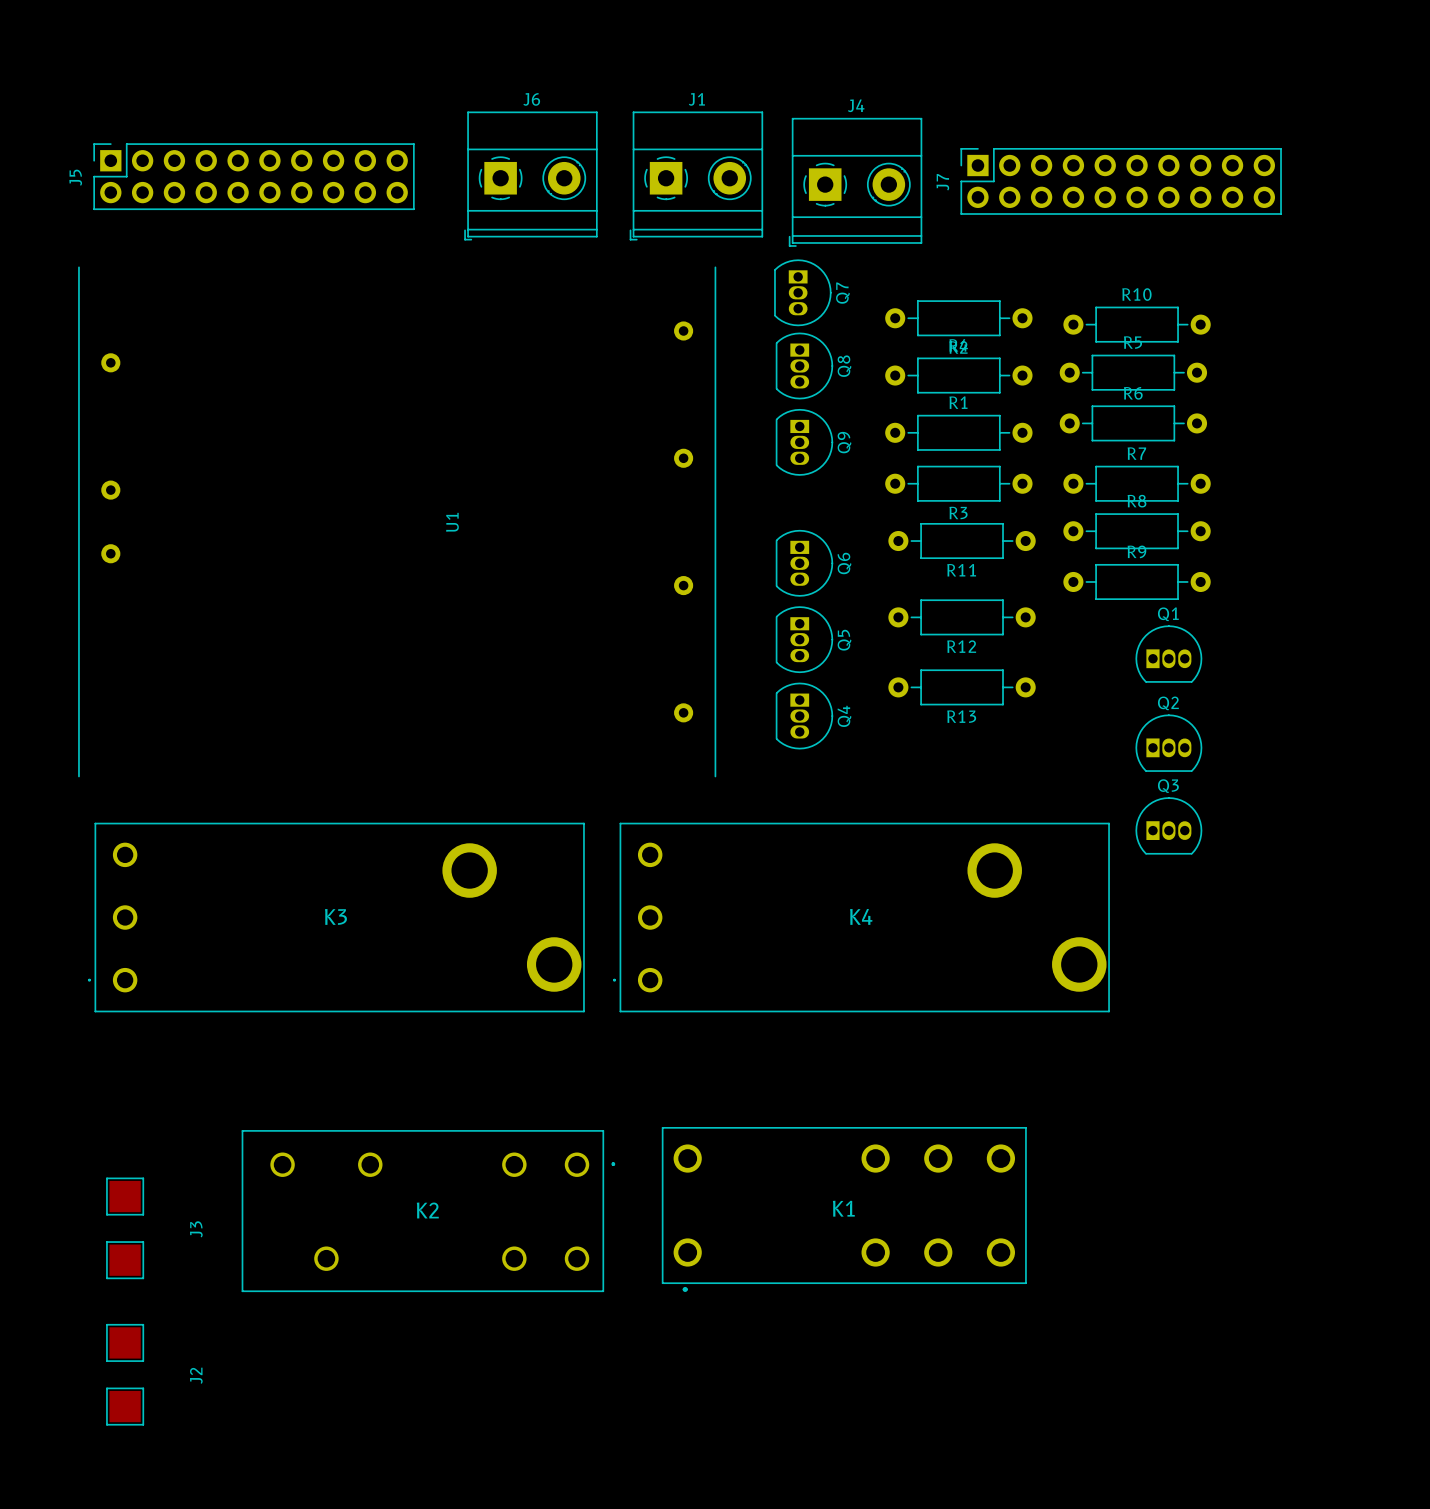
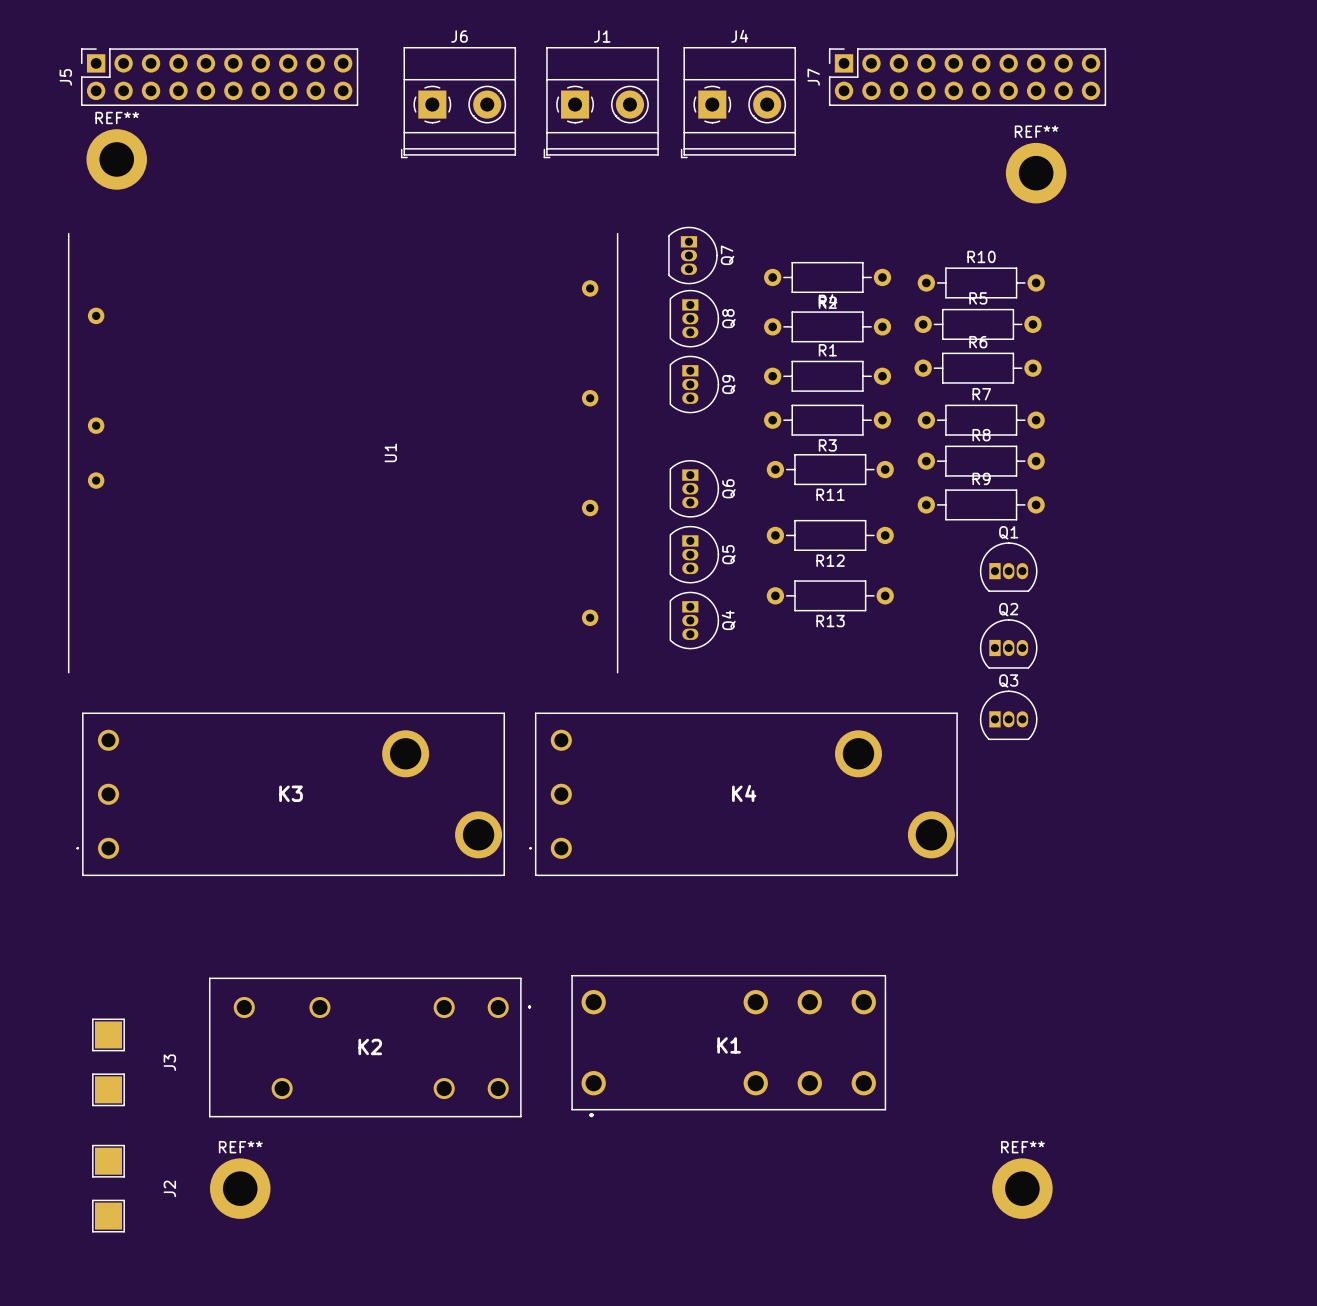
J6 position: (530, 175) -> (458, 102)
J1 position: (696, 175) -> (601, 102)
J5 position: (254, 176) -> (219, 77)
REF**: none -> (116, 159)
J7 position: (1121, 181) -> (967, 77)
J4 position: (855, 182) -> (738, 102)
REF**: none -> (1036, 173)
REF**: none -> (240, 1188)
REF**: none -> (1022, 1188)

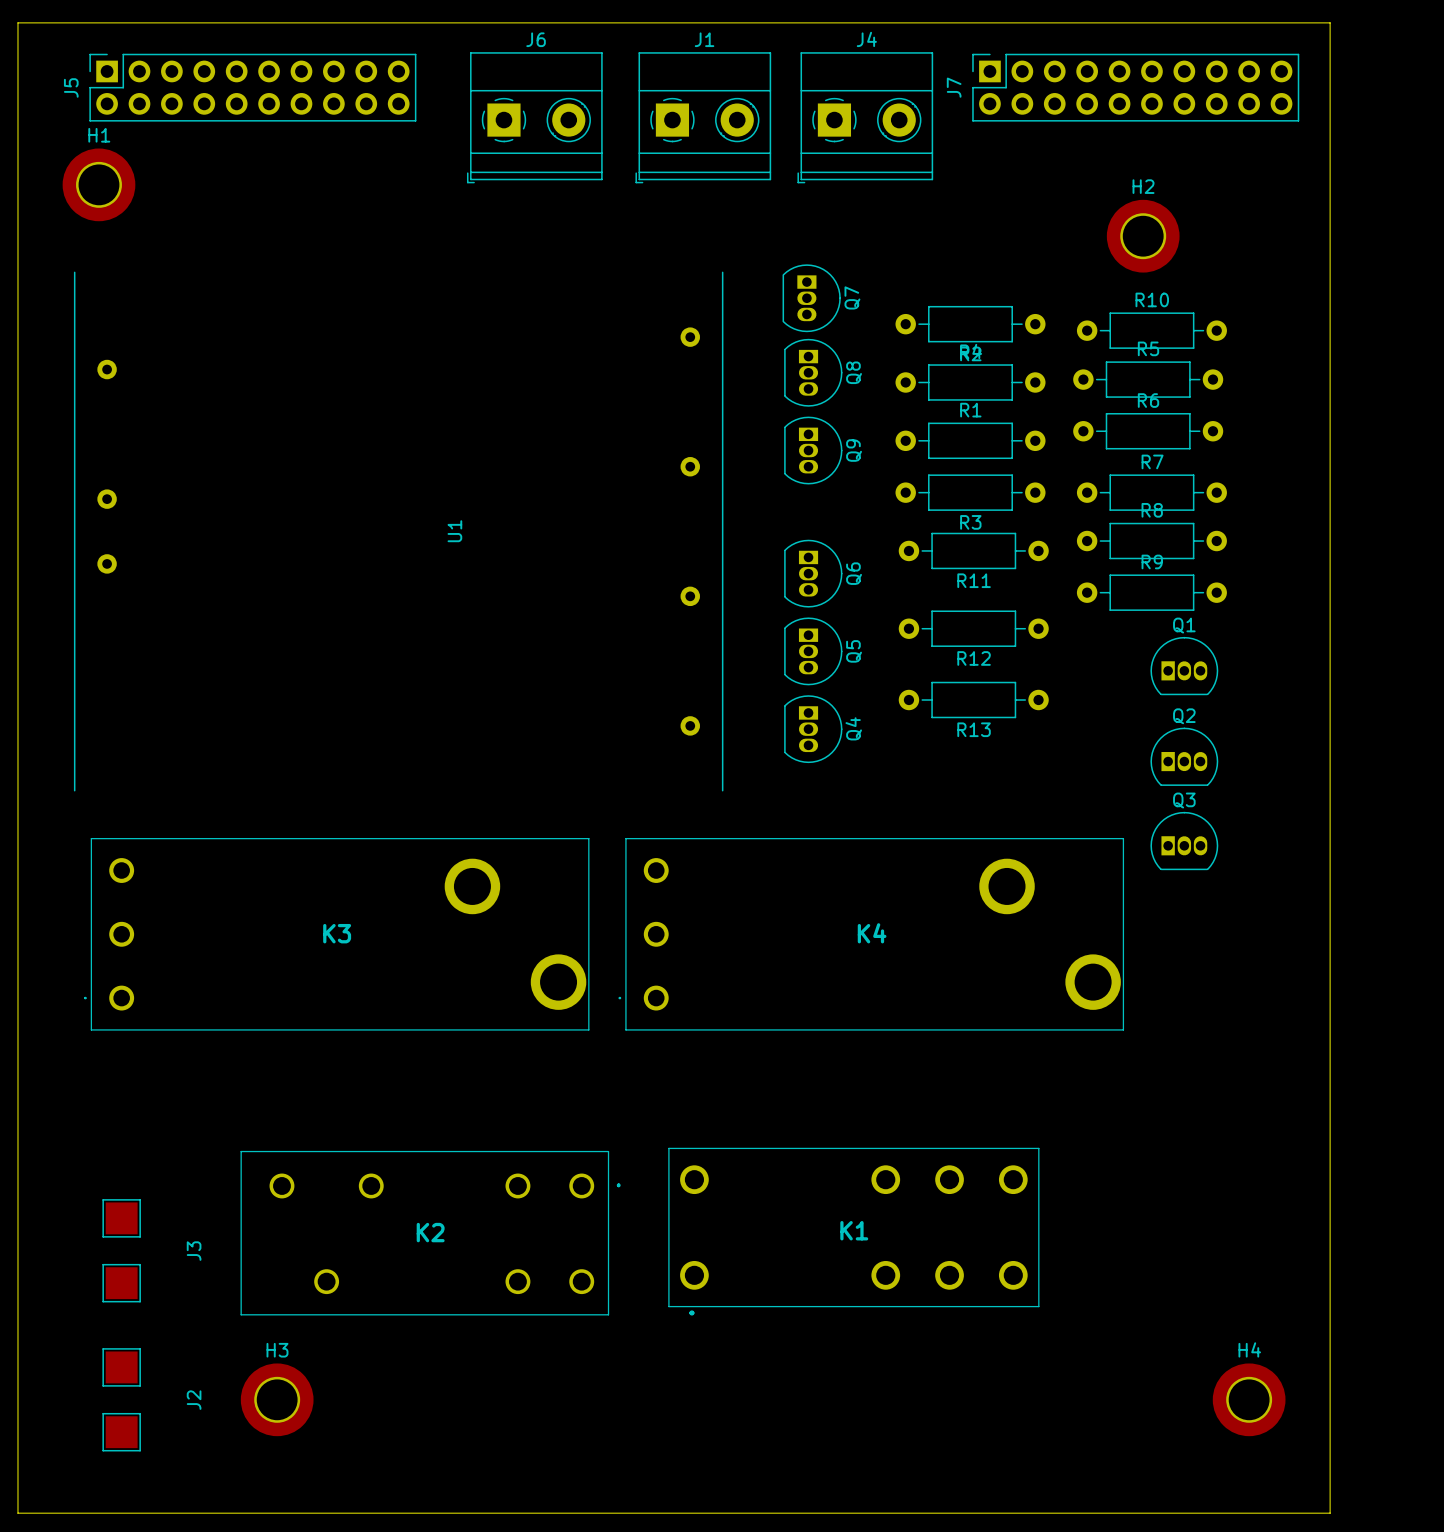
board edge: none -> (17, 22) (17, 1513) (1330, 1513) (1330, 22) (17, 22)
H1: none -> (98, 184)
REF**: (116, 159) -> none
REF**: (1036, 173) -> none
H2: none -> (1143, 236)
REF**: (240, 1188) -> none
H3: none -> (277, 1399)
REF**: (1022, 1188) -> none
H4: none -> (1249, 1399)

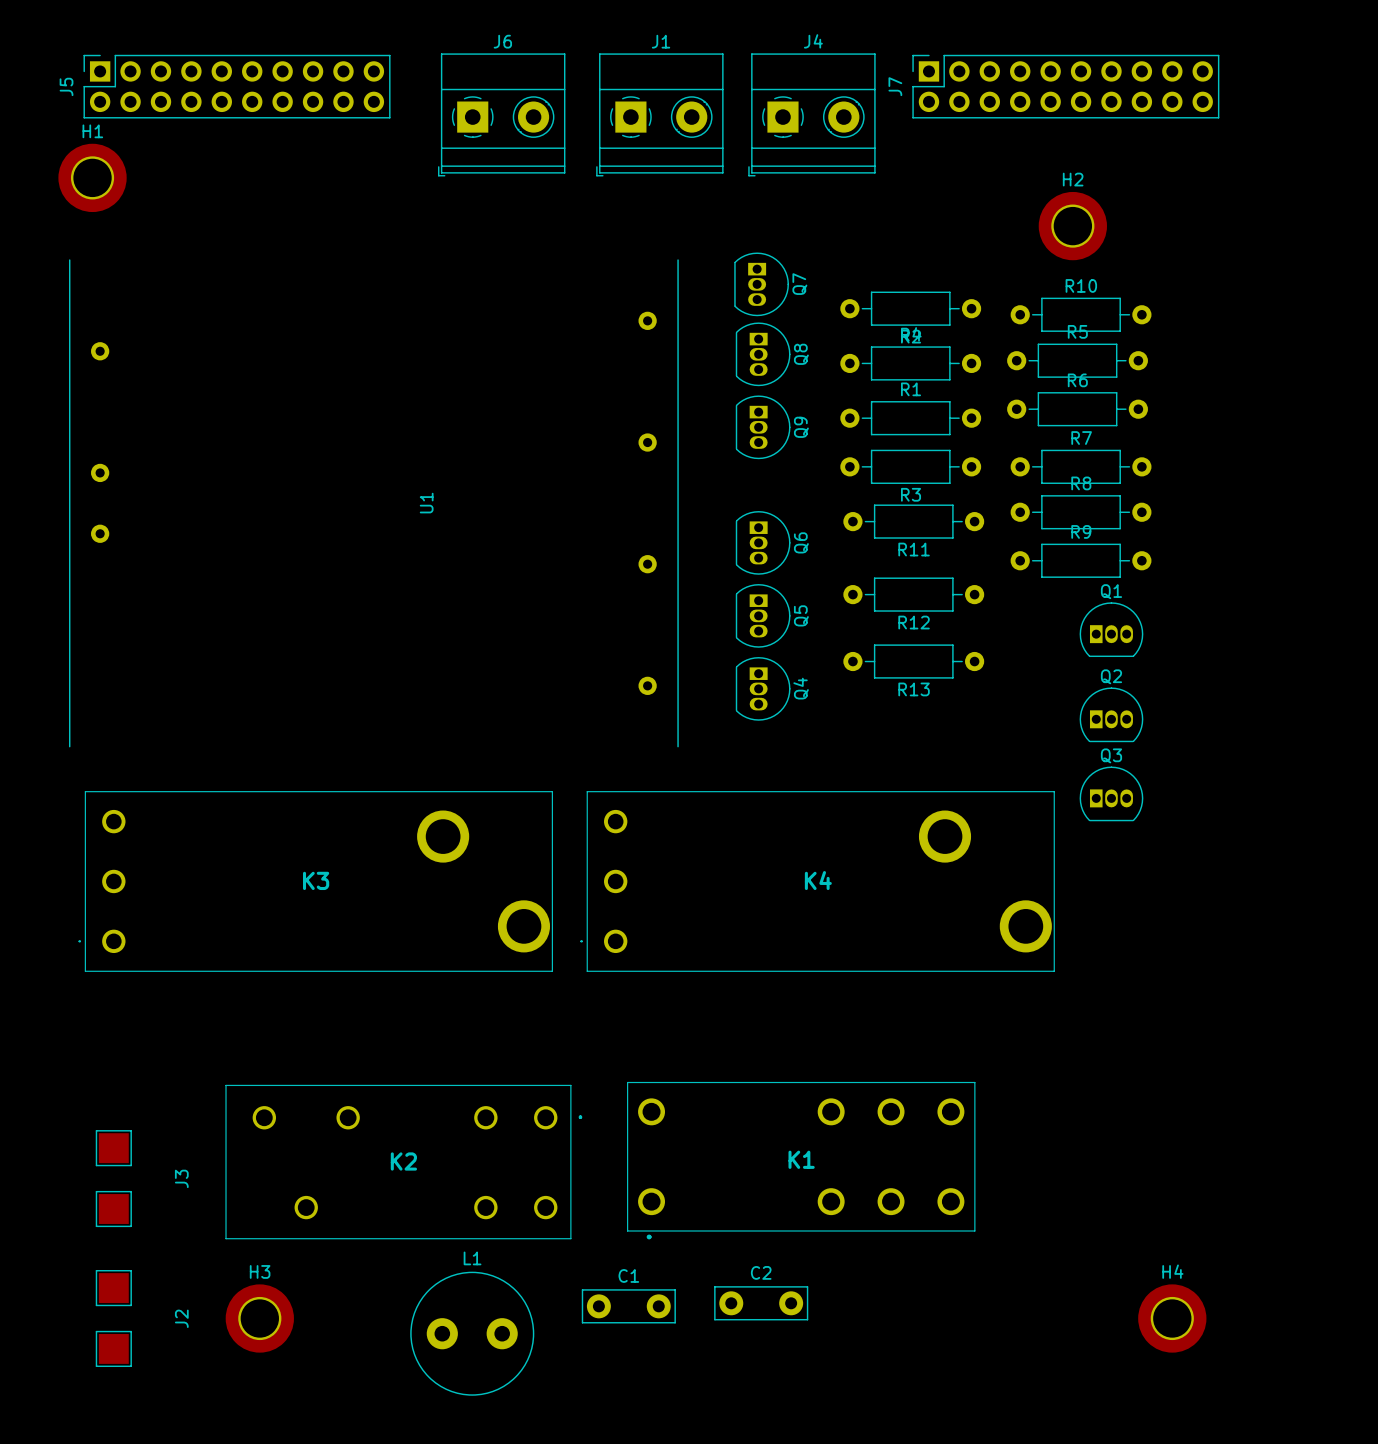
board edge: (17, 22) (17, 1513) (1330, 1513) (1330, 22) (17, 22) -> none
C2: none -> (761, 1303)
C1: none -> (628, 1306)
L1: none -> (472, 1333)

